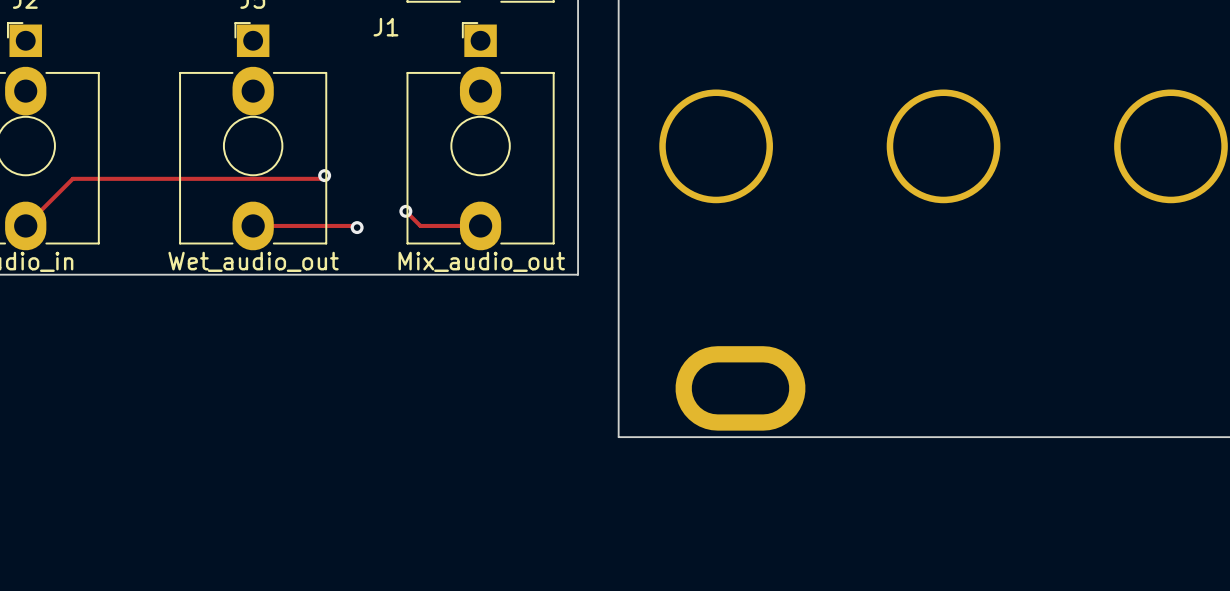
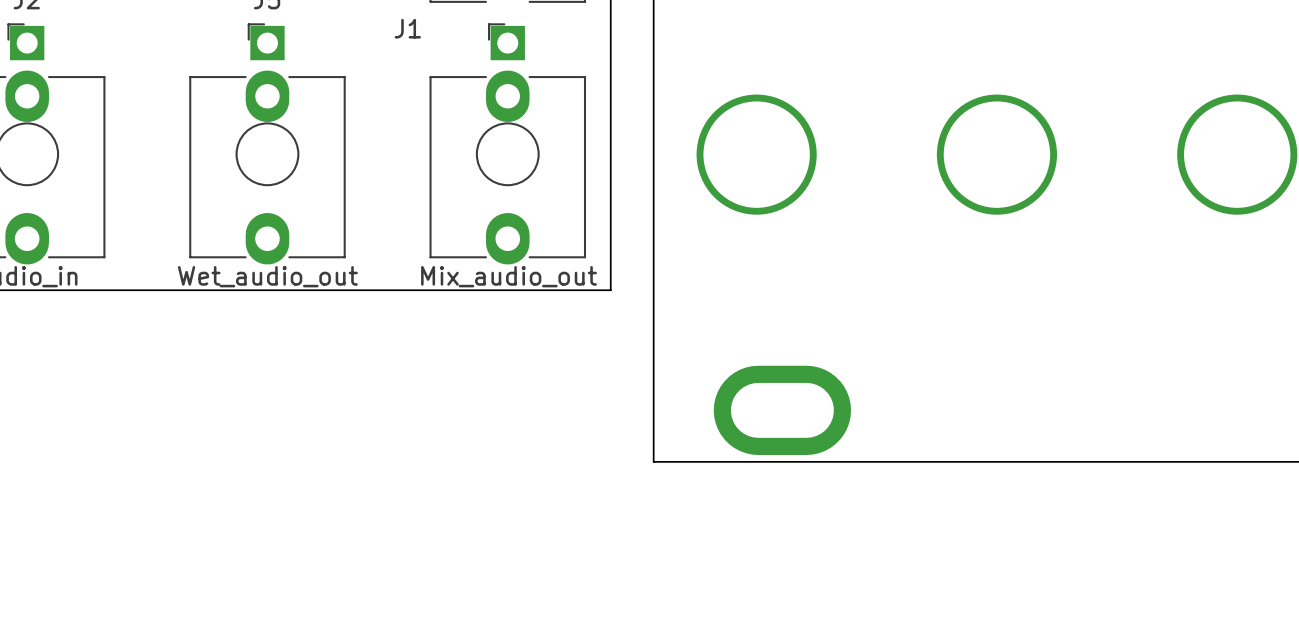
track: (324, 175) (321, 178) (72, 178) (25, 225) -> none
via: (324, 175) -> none
track: (405, 211) (420, 225) (480, 225) -> none
via: (405, 211) -> none
track: (253, 225) (355, 225) (357, 227) -> none
via: (357, 227) -> none

